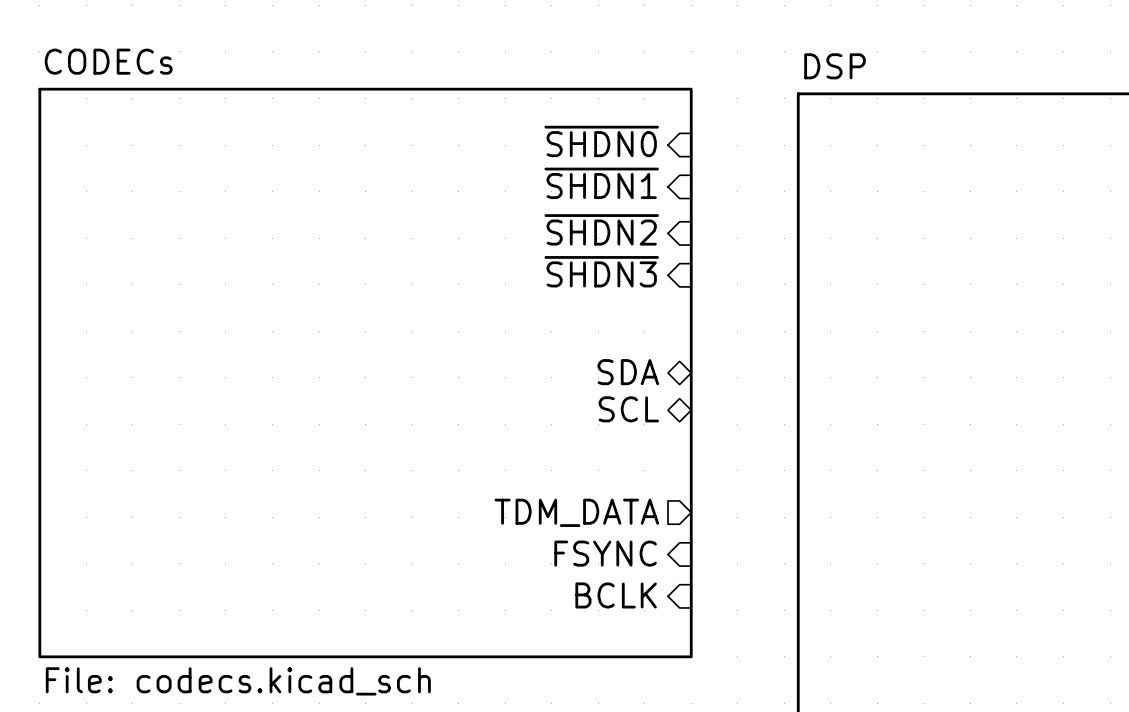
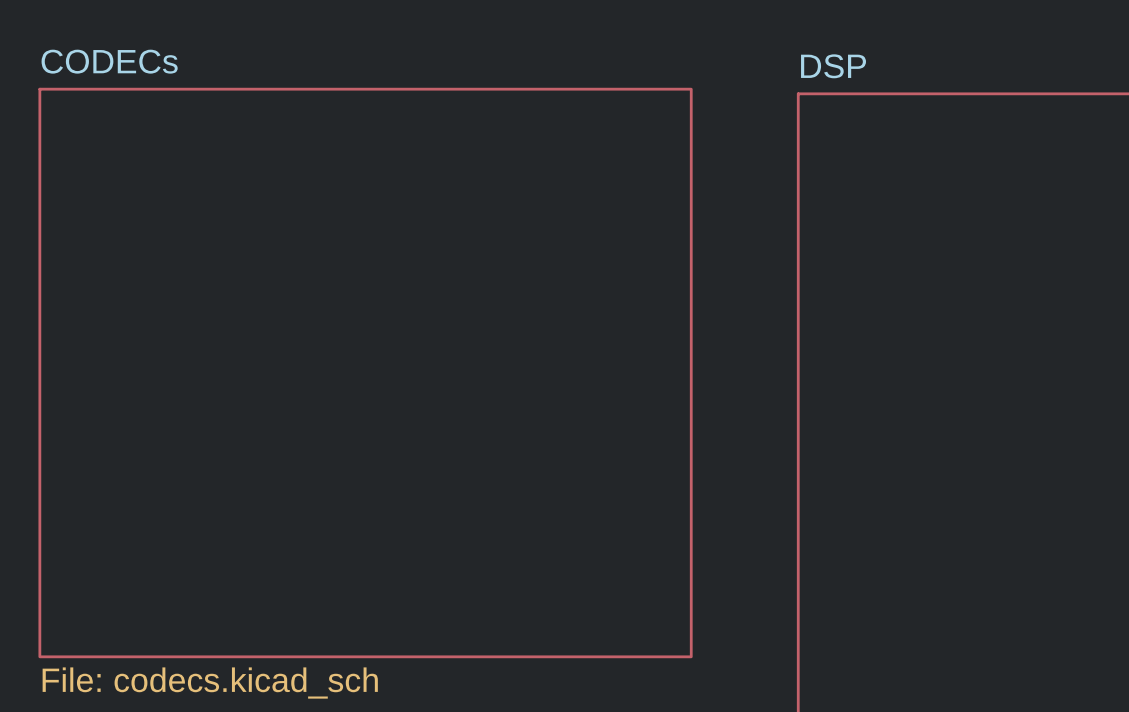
sheet pin: ~{SHDN0} (601, 141) -> none
sheet pin: ~{SHDN1} (601, 183) -> none
sheet pin: ~{SHDN2} (601, 229) -> none
sheet pin: ~{SHDN3} (601, 271) -> none
sheet pin: SDA (628, 372) -> none
sheet pin: SCL (628, 409) -> none
sheet pin: TDM_DATA (576, 512) -> none
sheet pin: FSYNC (605, 553) -> none
sheet pin: BCLK (616, 595) -> none

